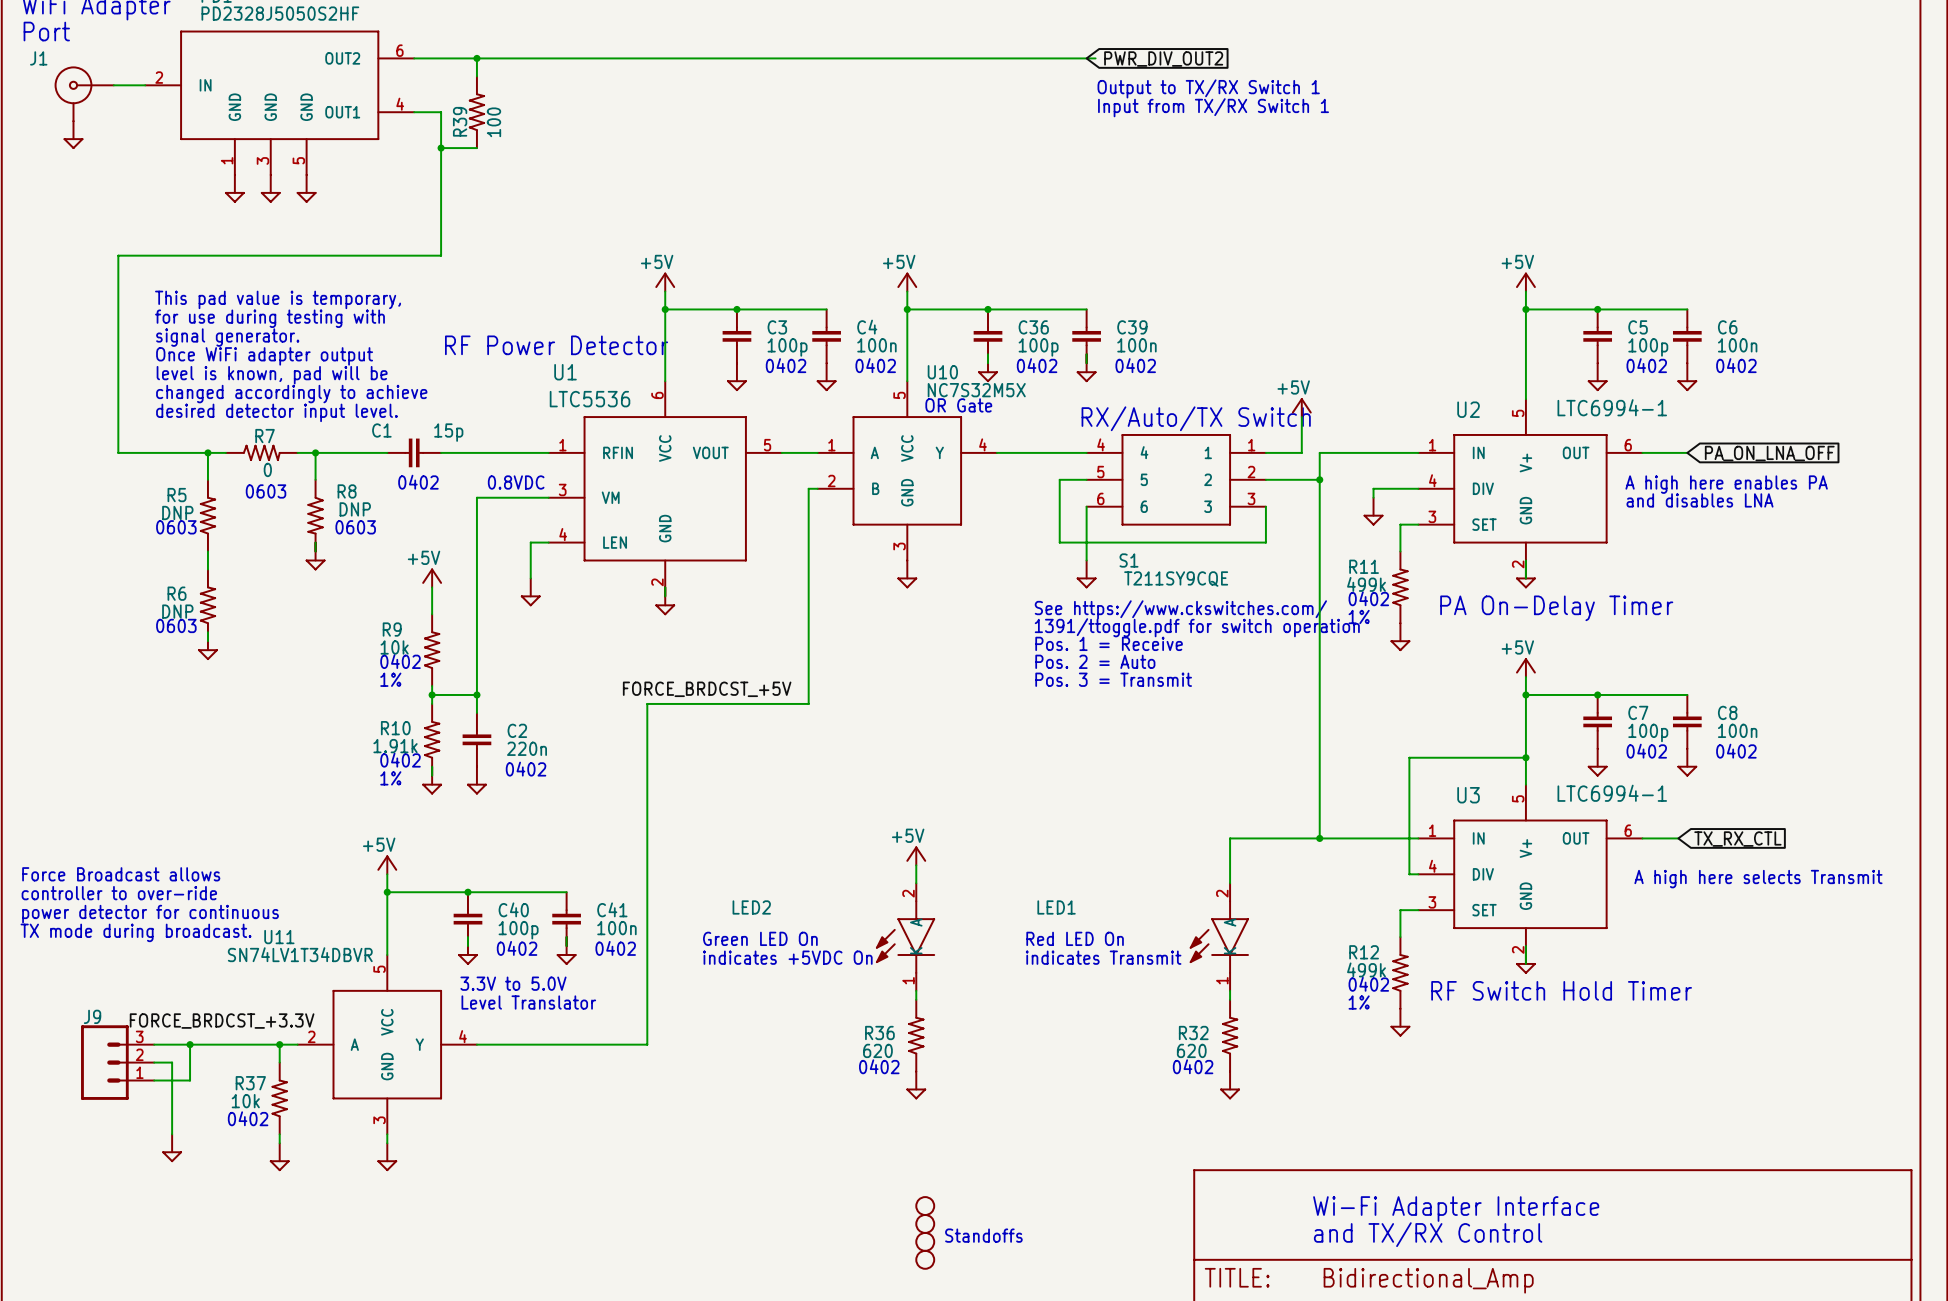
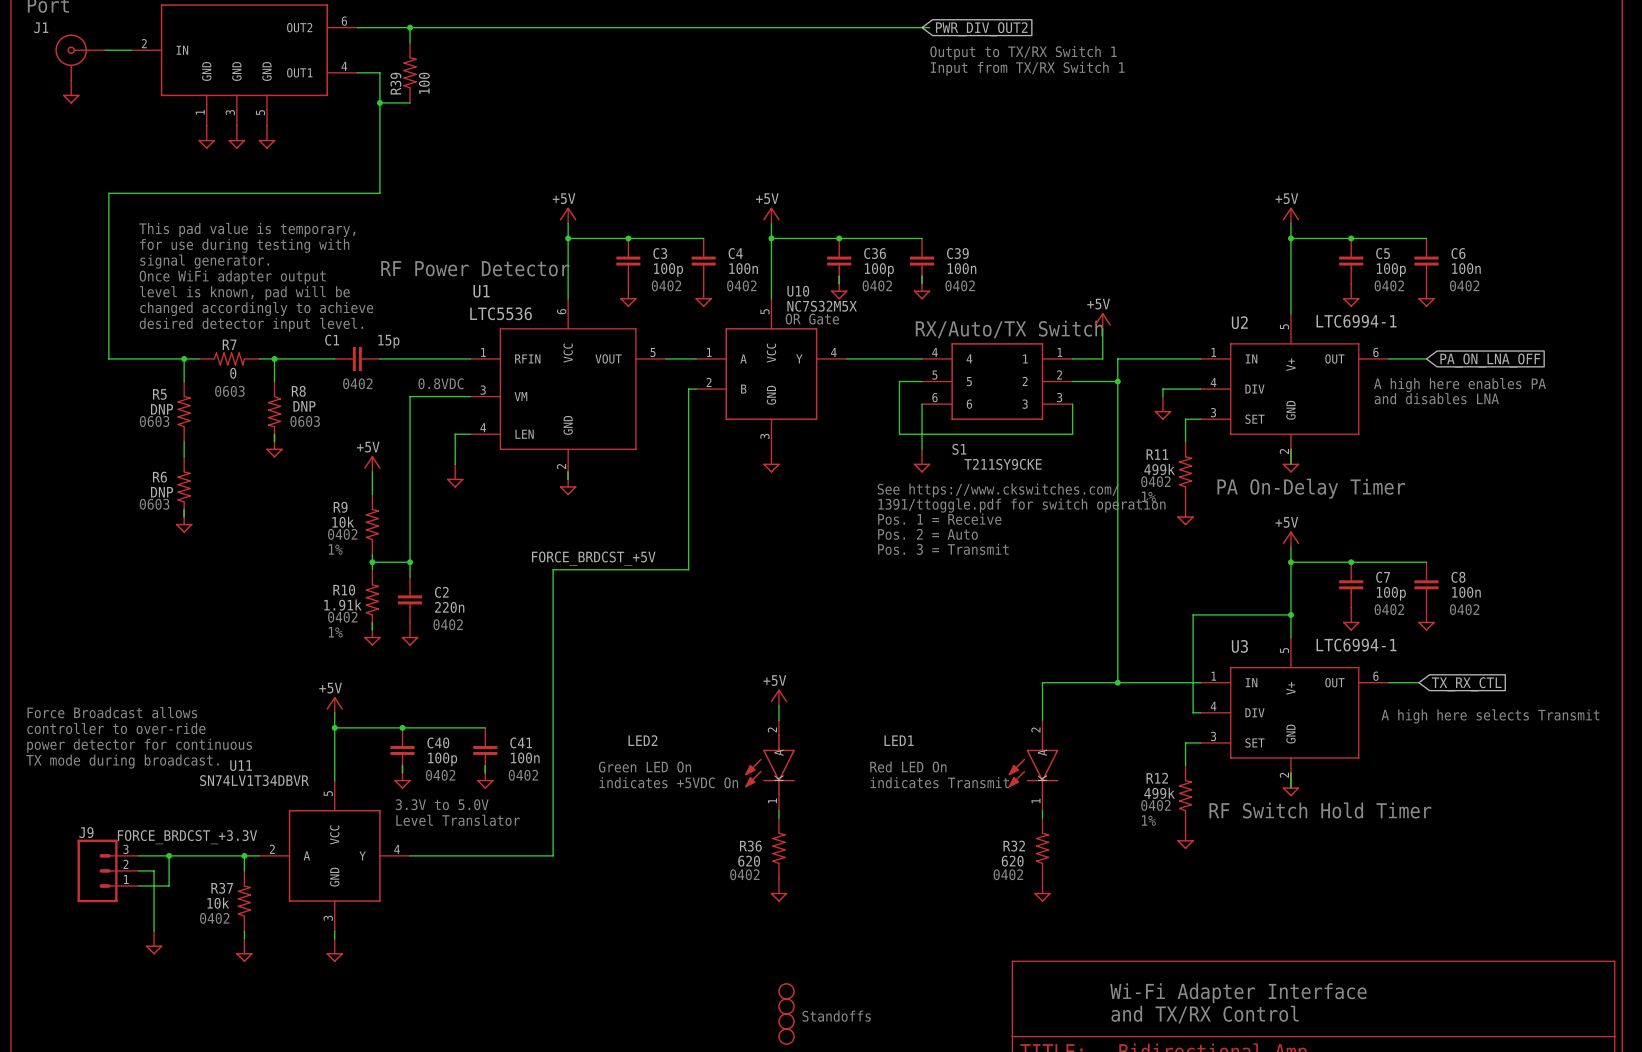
S1 value: T211SY9CQE (1176, 579) -> T211SY9CKE (1003, 464)

